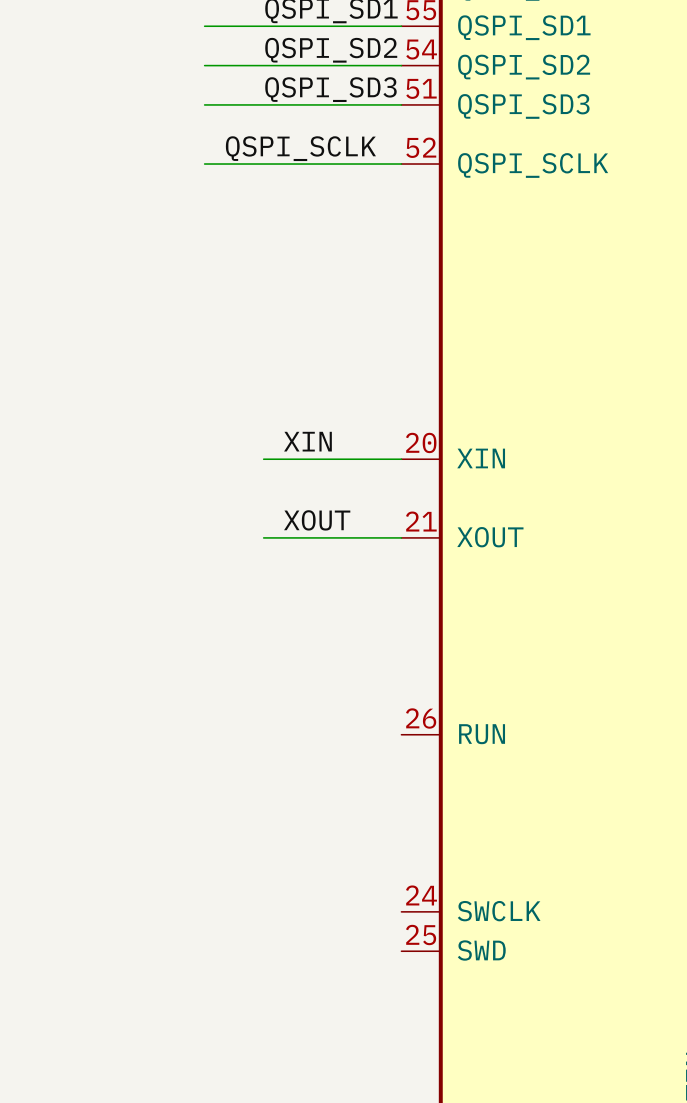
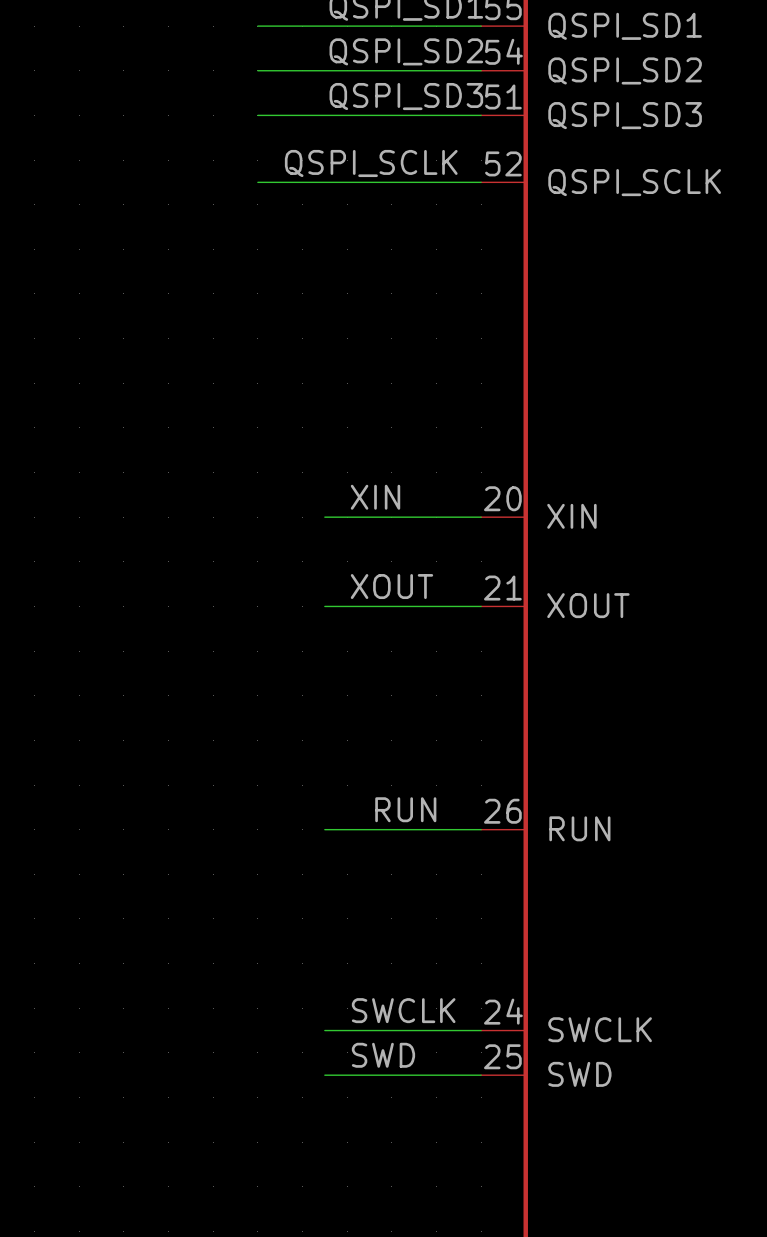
label: none -> RUN (405, 809)
wire: none -> (324, 829) (481, 829)
label: none -> SWCLK (403, 1010)
wire: none -> (324, 1030) (481, 1030)
label: none -> SWD (383, 1055)
wire: none -> (324, 1075) (481, 1075)

